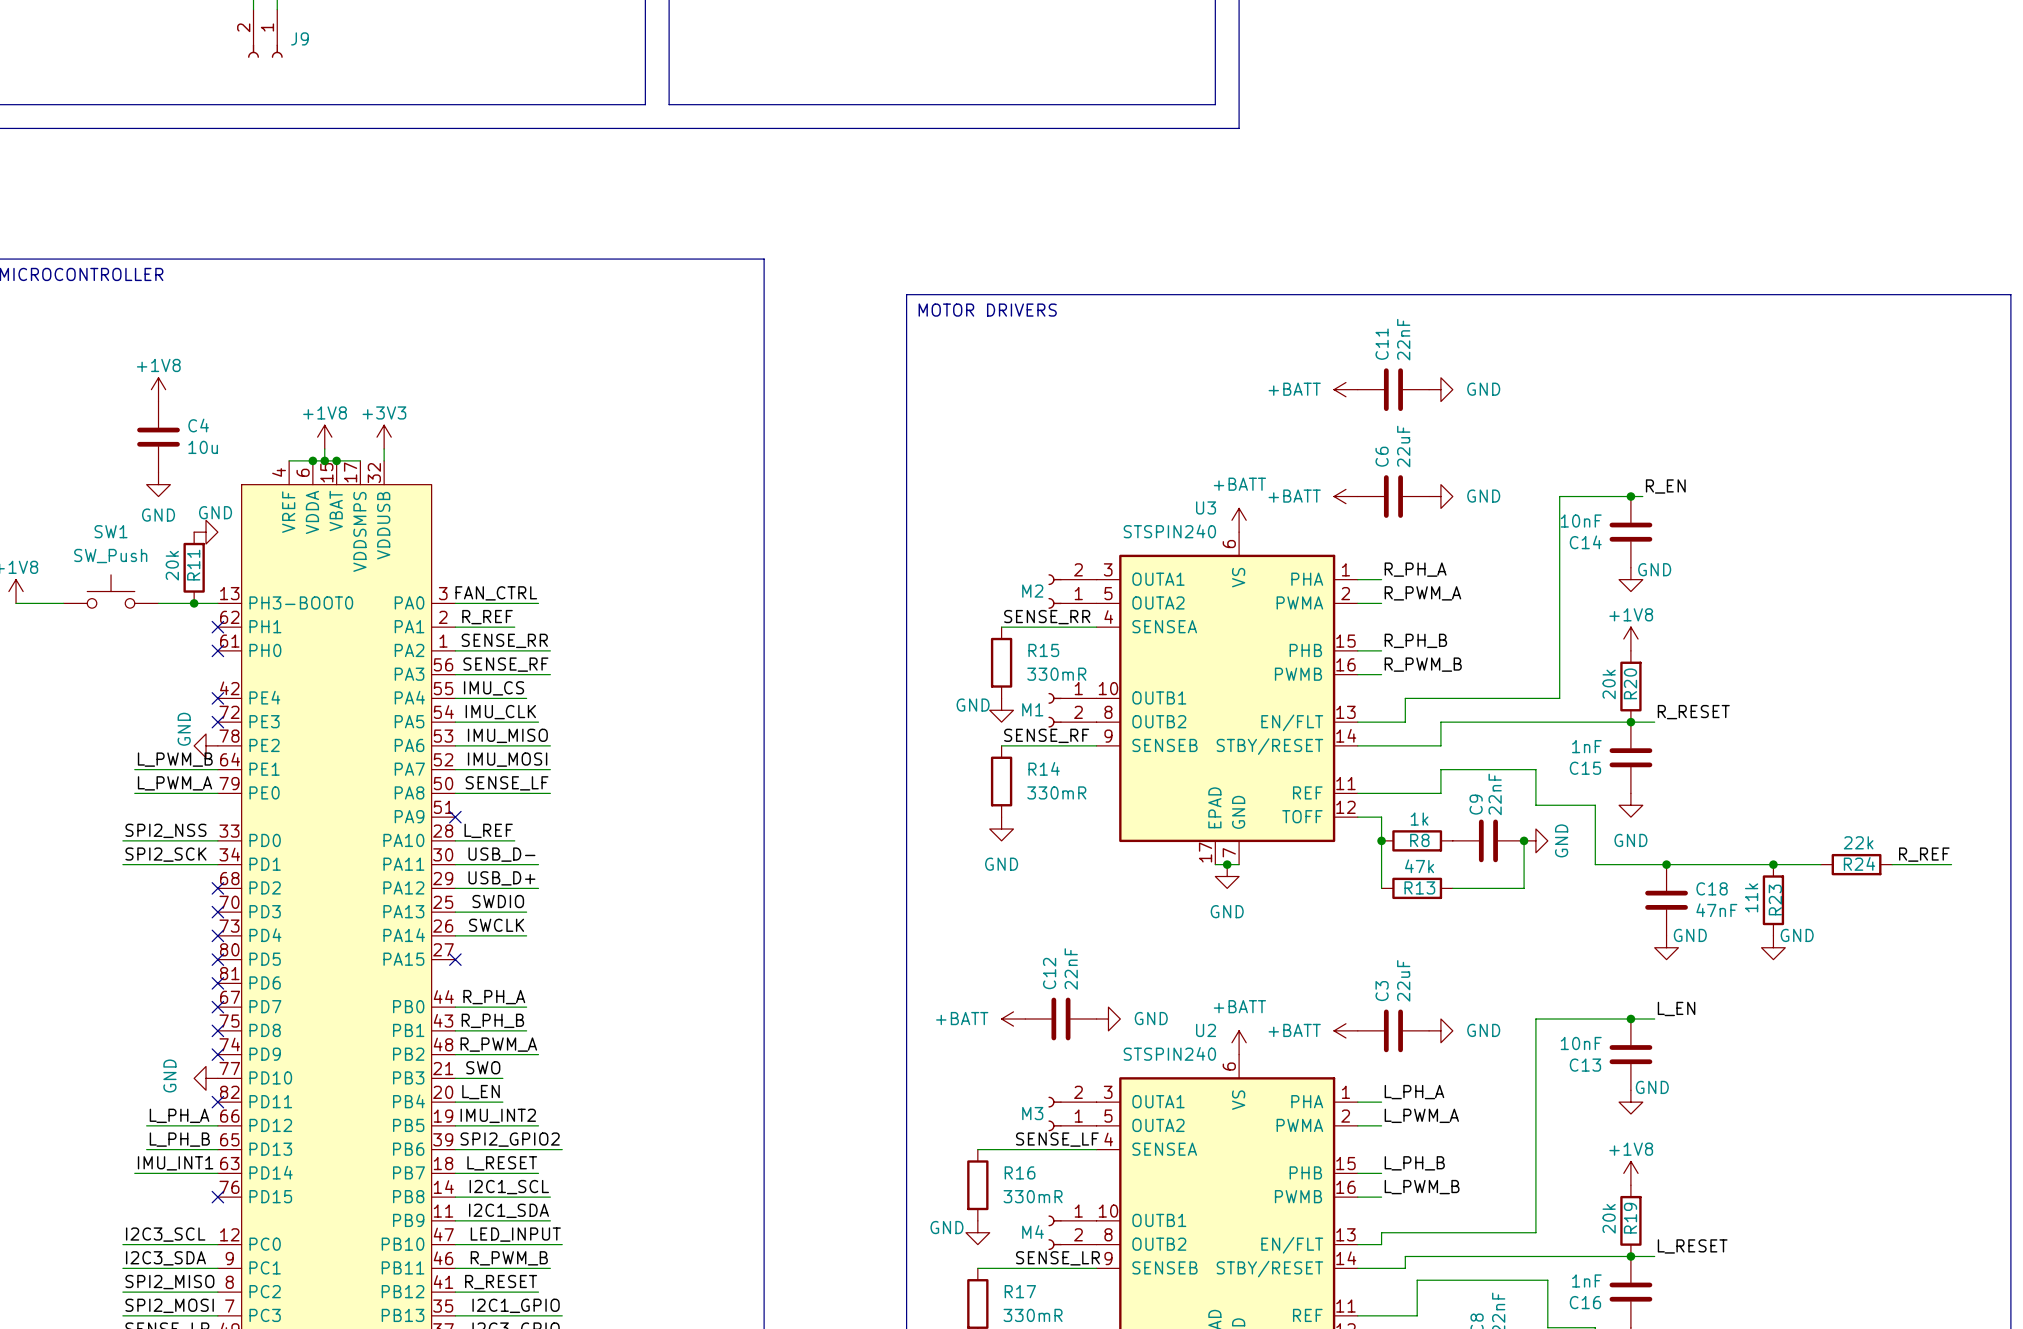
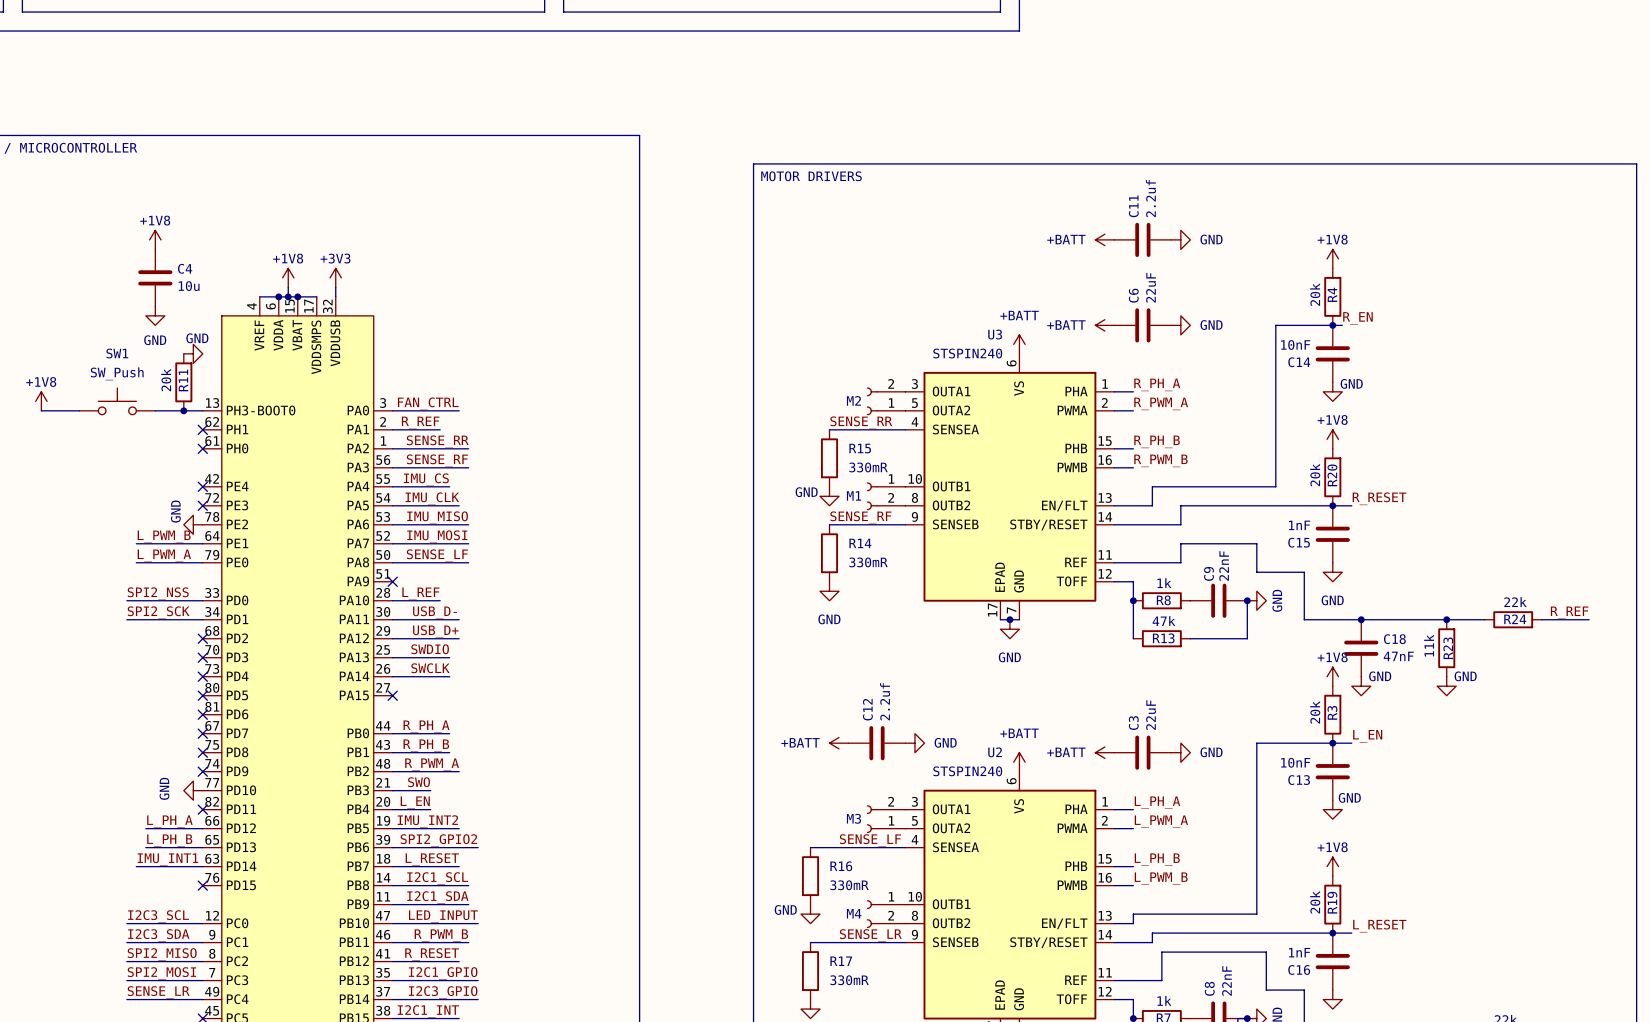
C11 value: 22nF (1403, 339) -> 2.2uf (1150, 198)
power symbol: none -> +1V8 (1332, 258)
R4: none -> 20k (1332, 296)
power symbol: none -> +1V8 (1332, 676)
C12 value: 22nF (1071, 968) -> 2.2uf (885, 701)
R3: none -> 20k (1332, 714)

